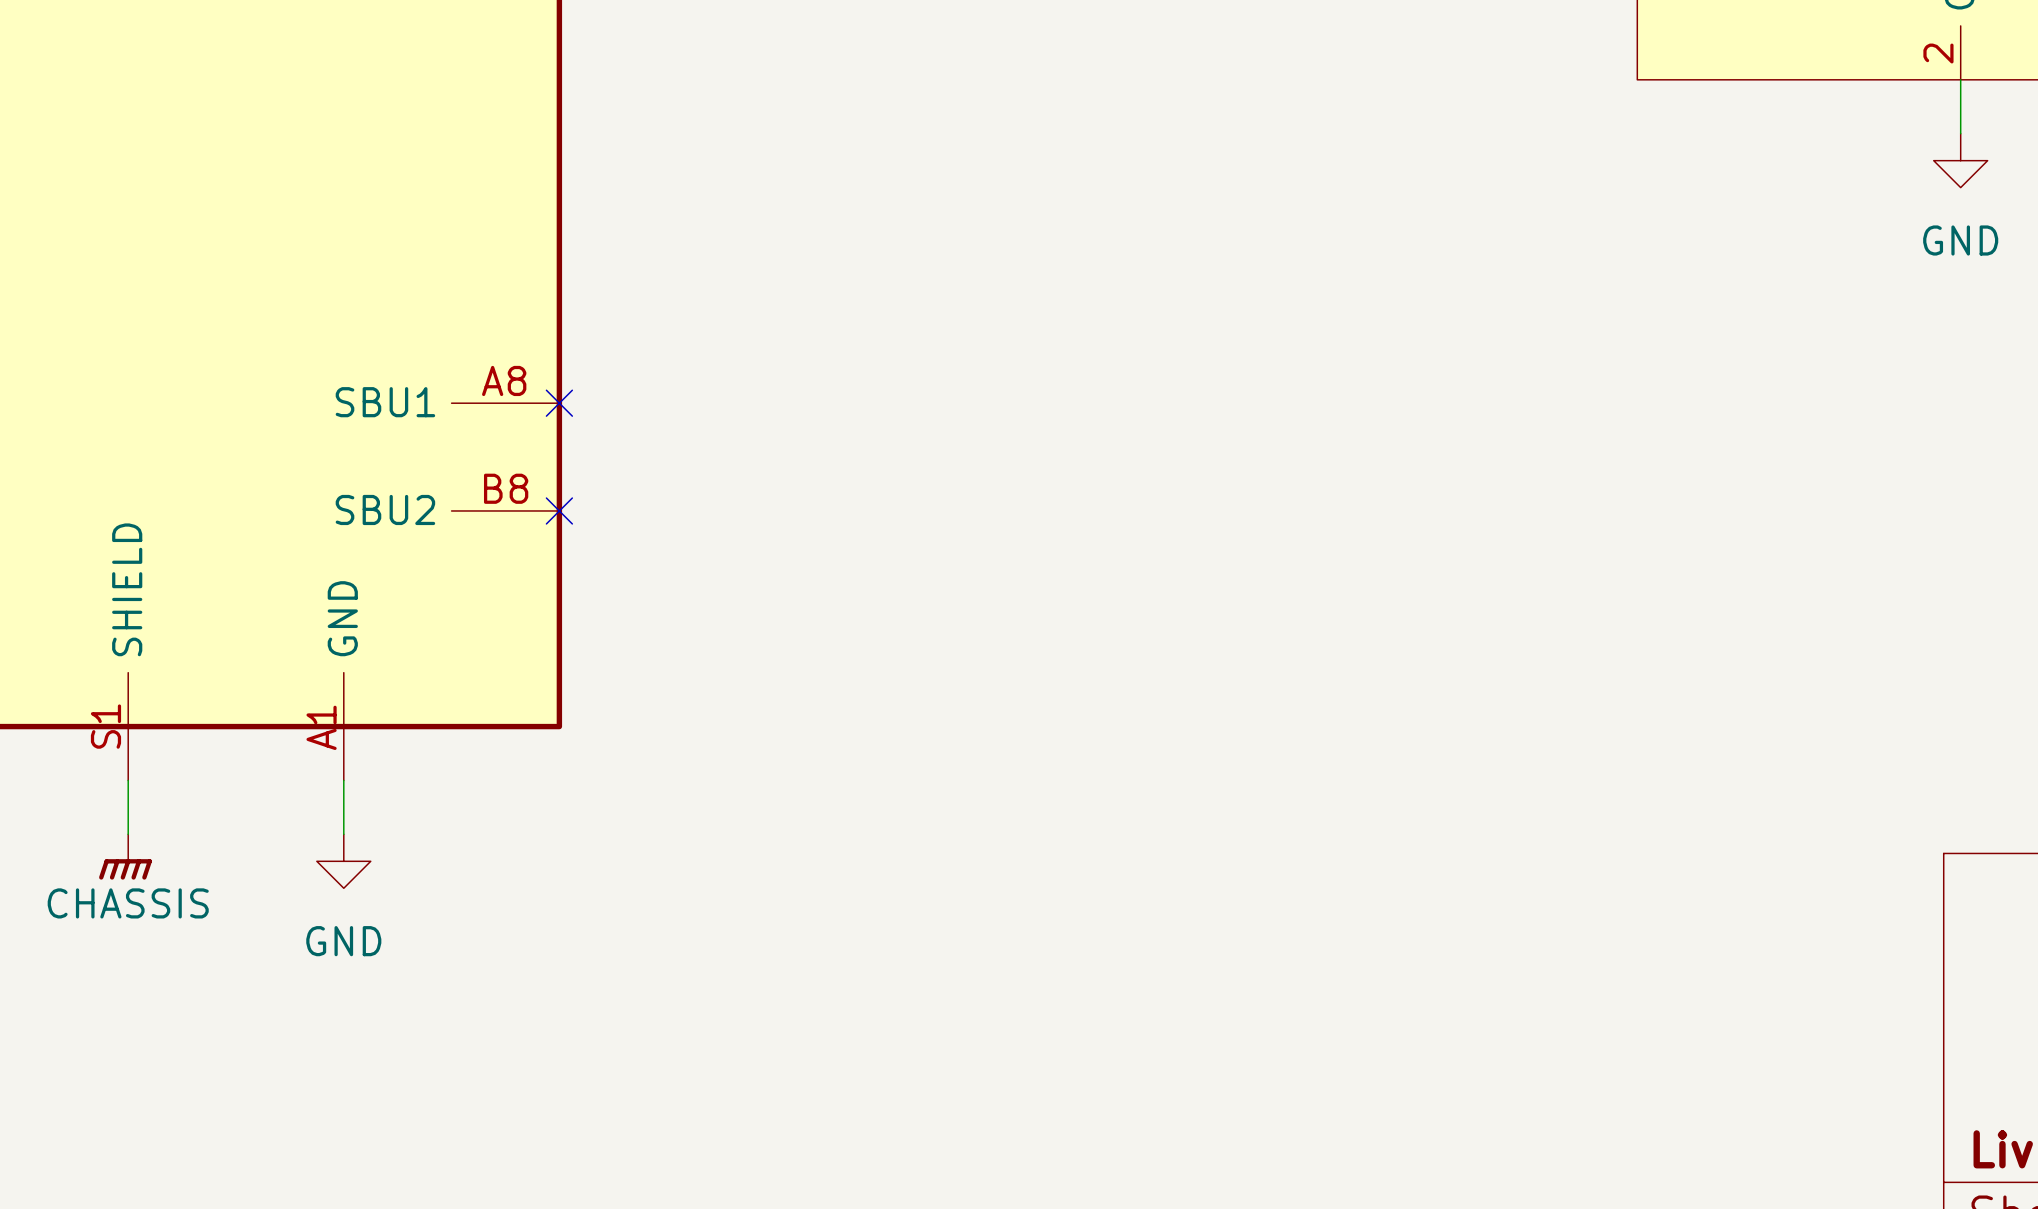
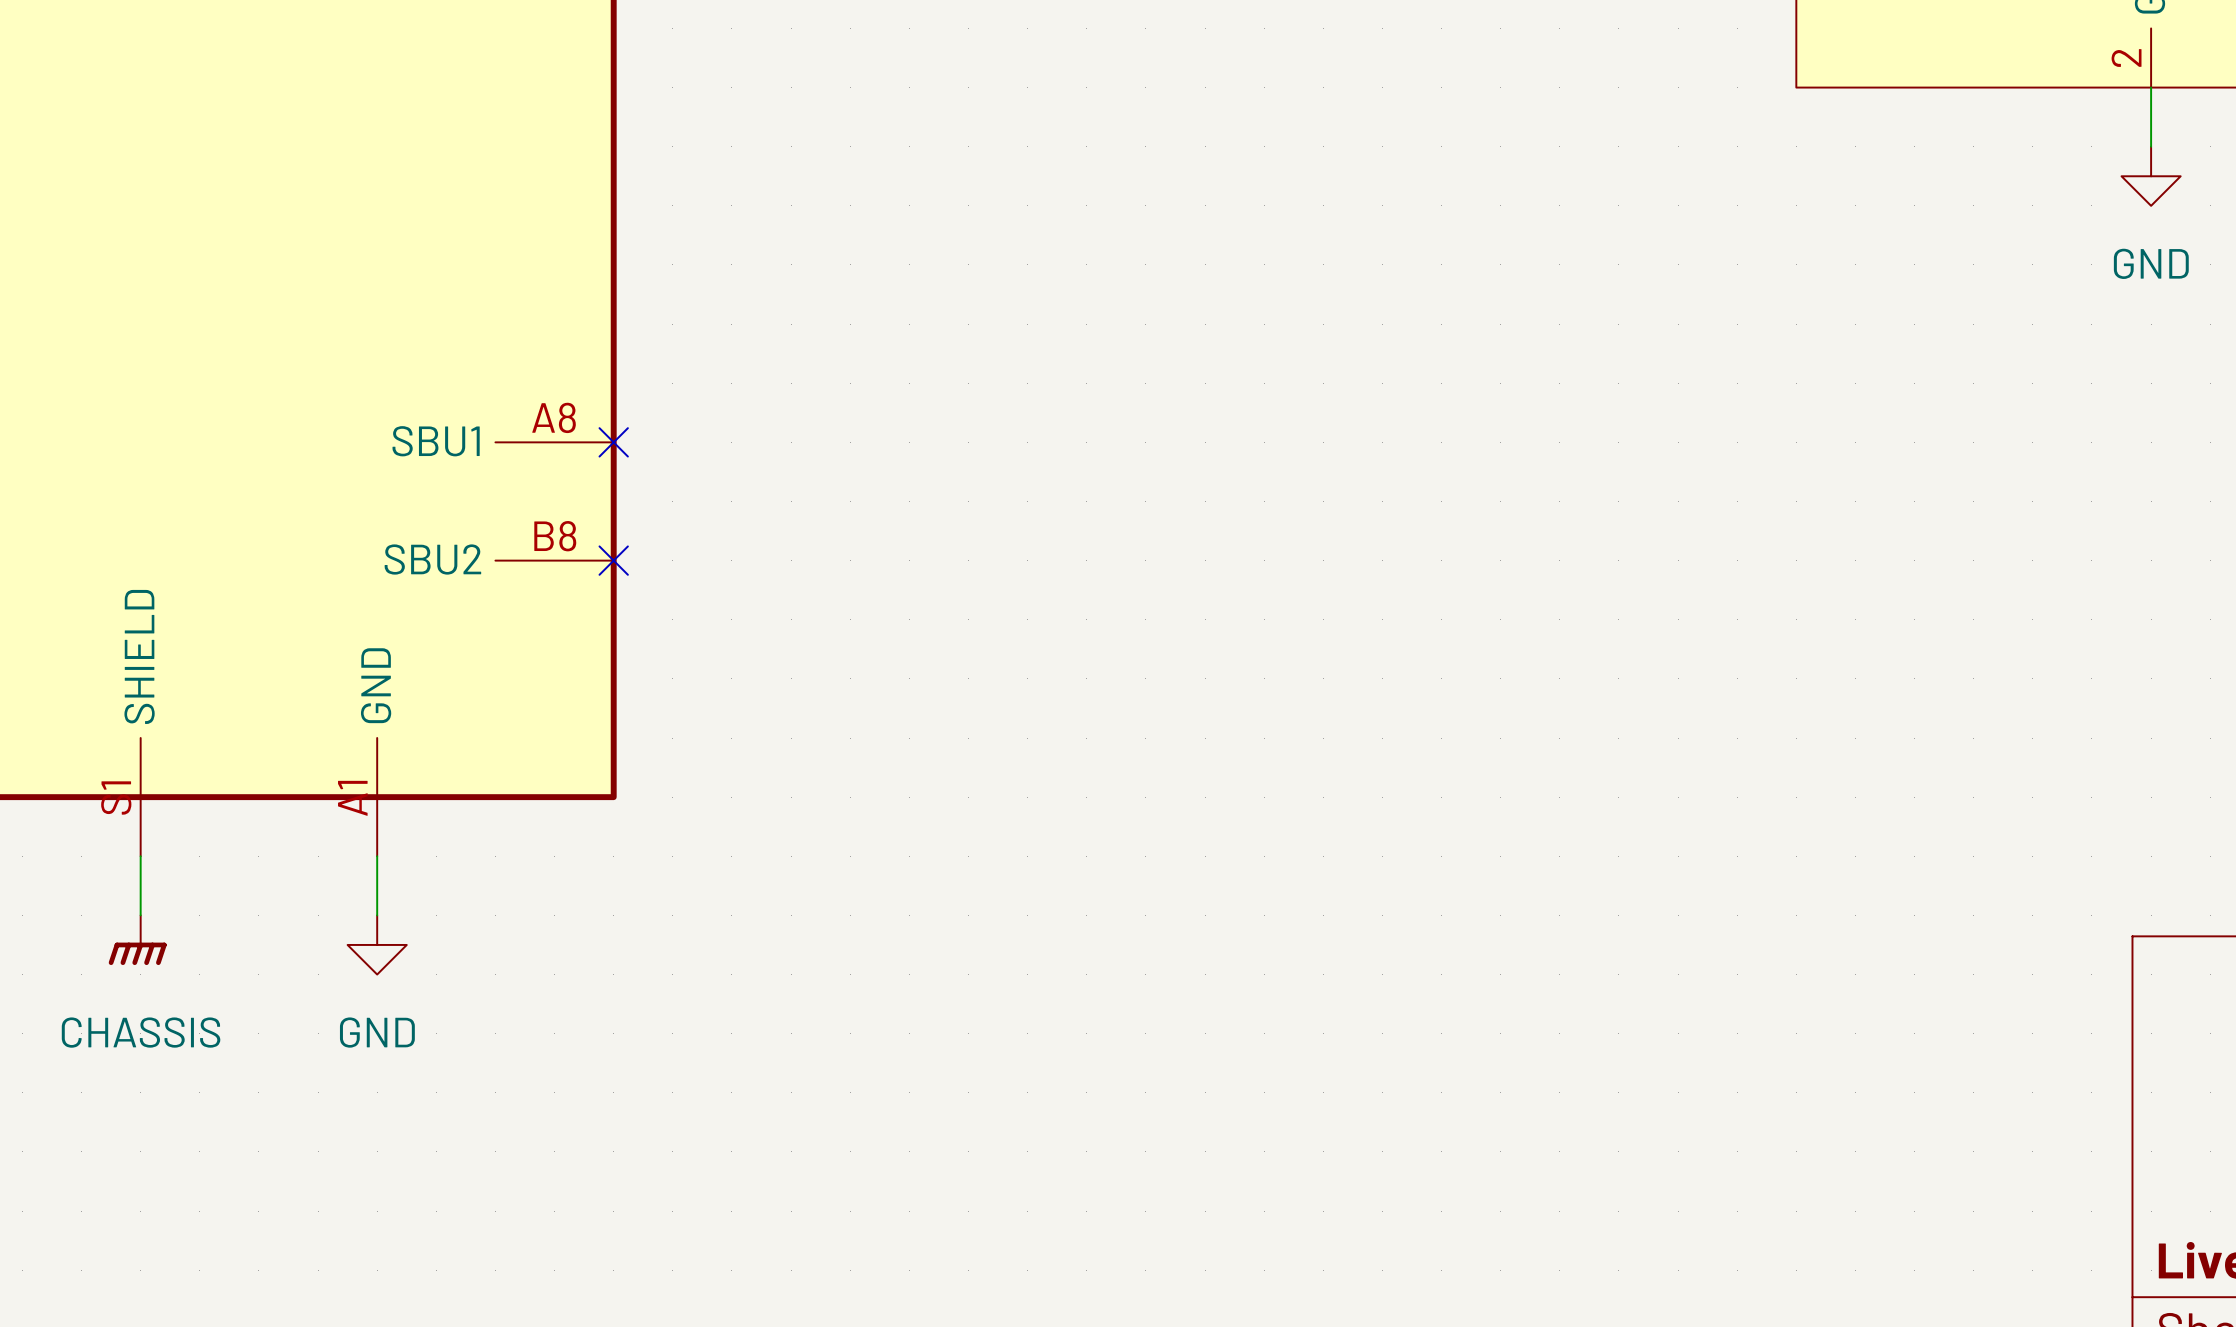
power symbol text position: CHASSIS (128, 903) -> CHASSIS (141, 1032)

